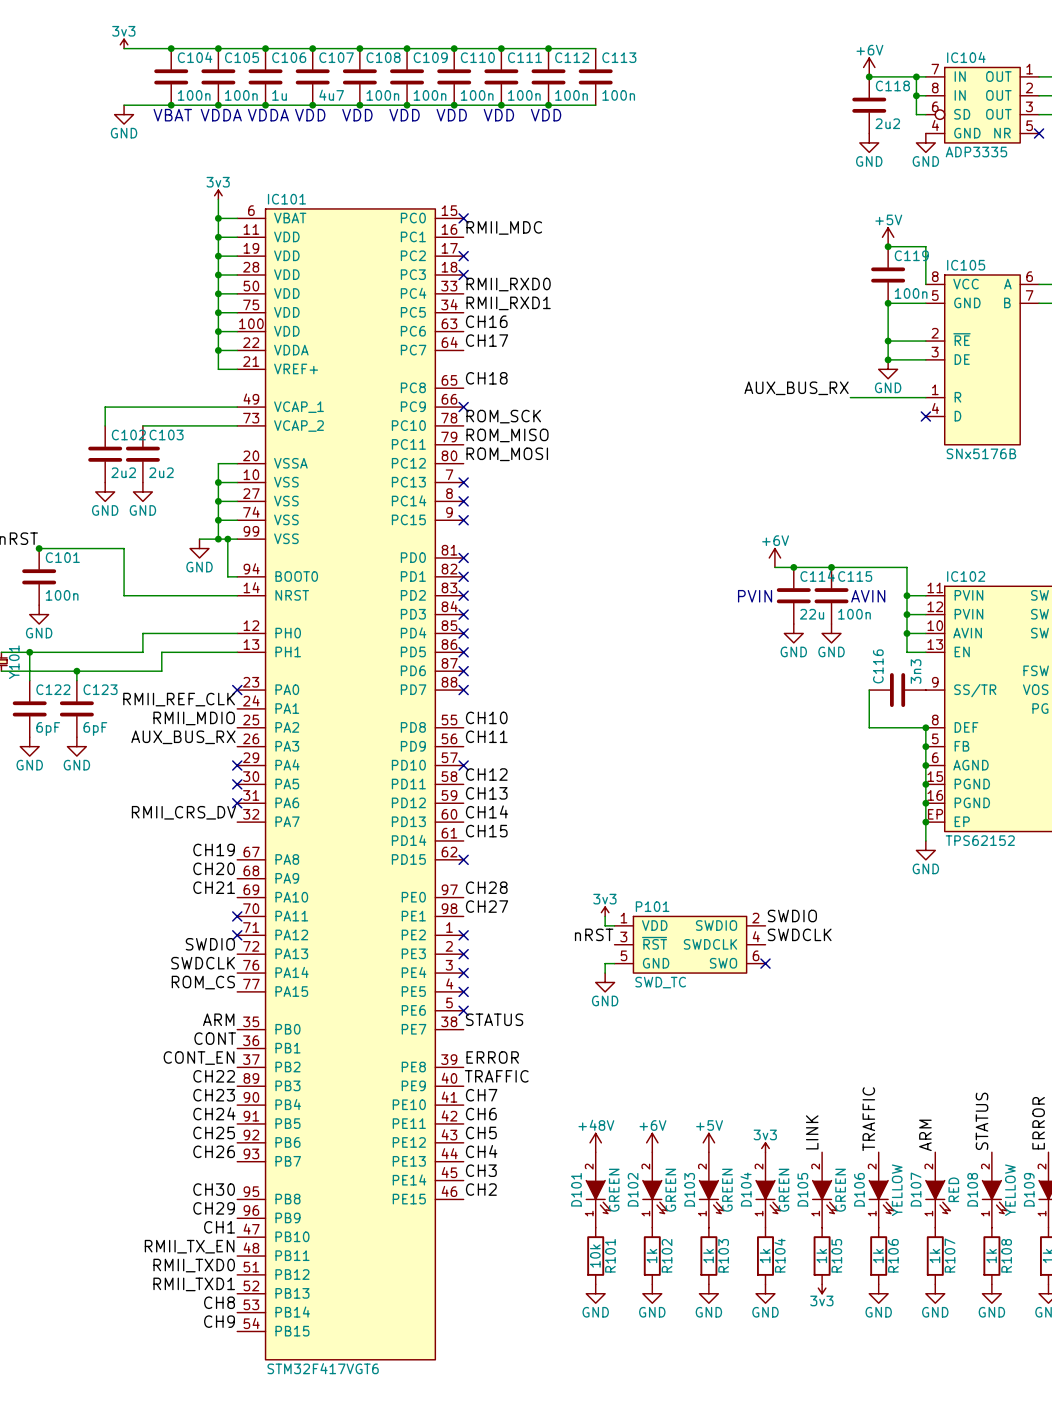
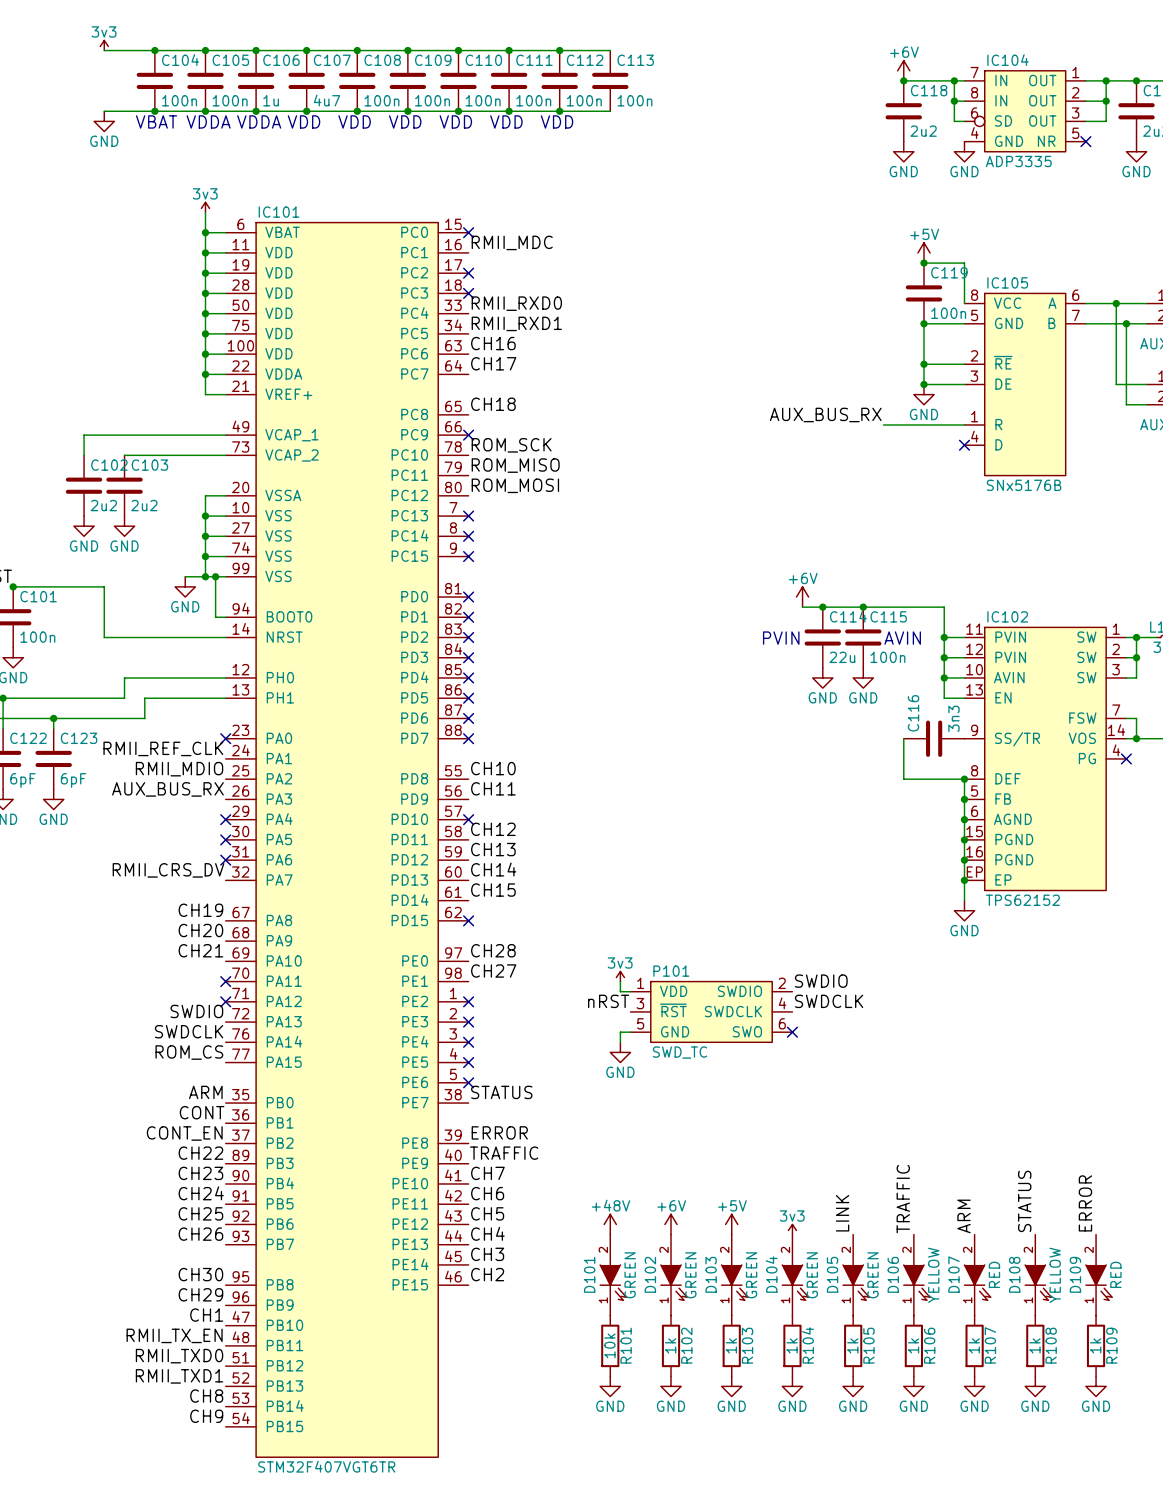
power symbol: 3v3 (822, 1289) -> GND (853, 1386)
IC101 value: STM32F417VGT6 (323, 1368) -> STM32F407VGT6TR (326, 1466)

